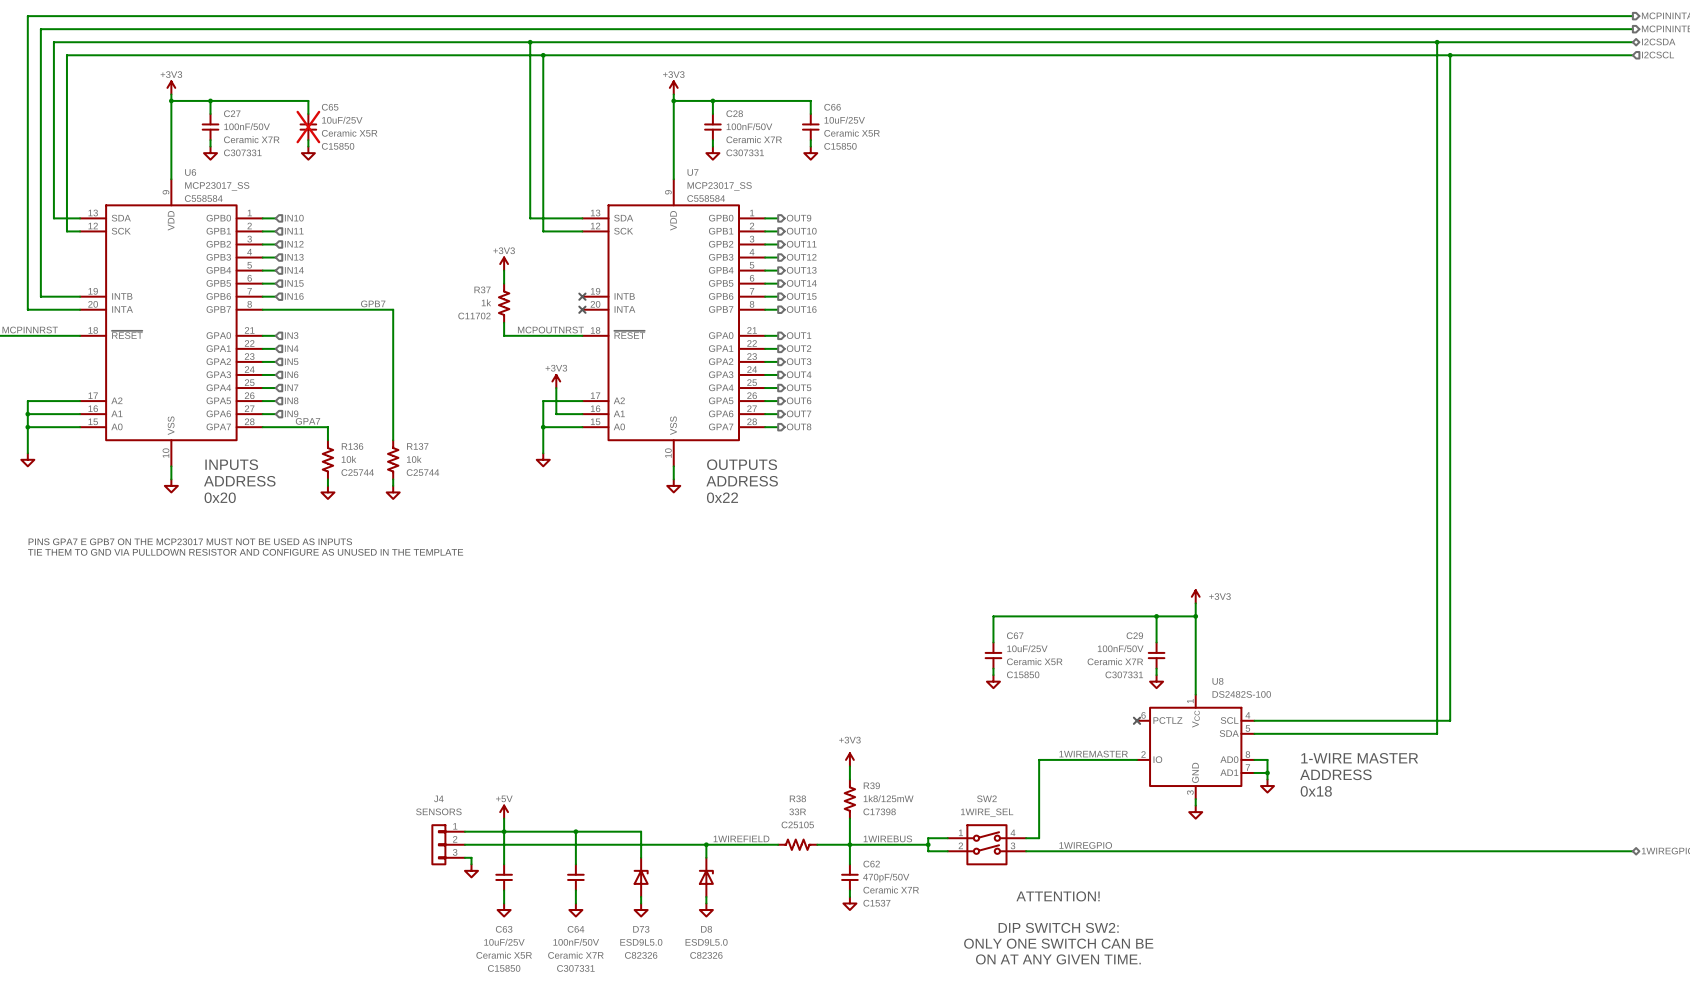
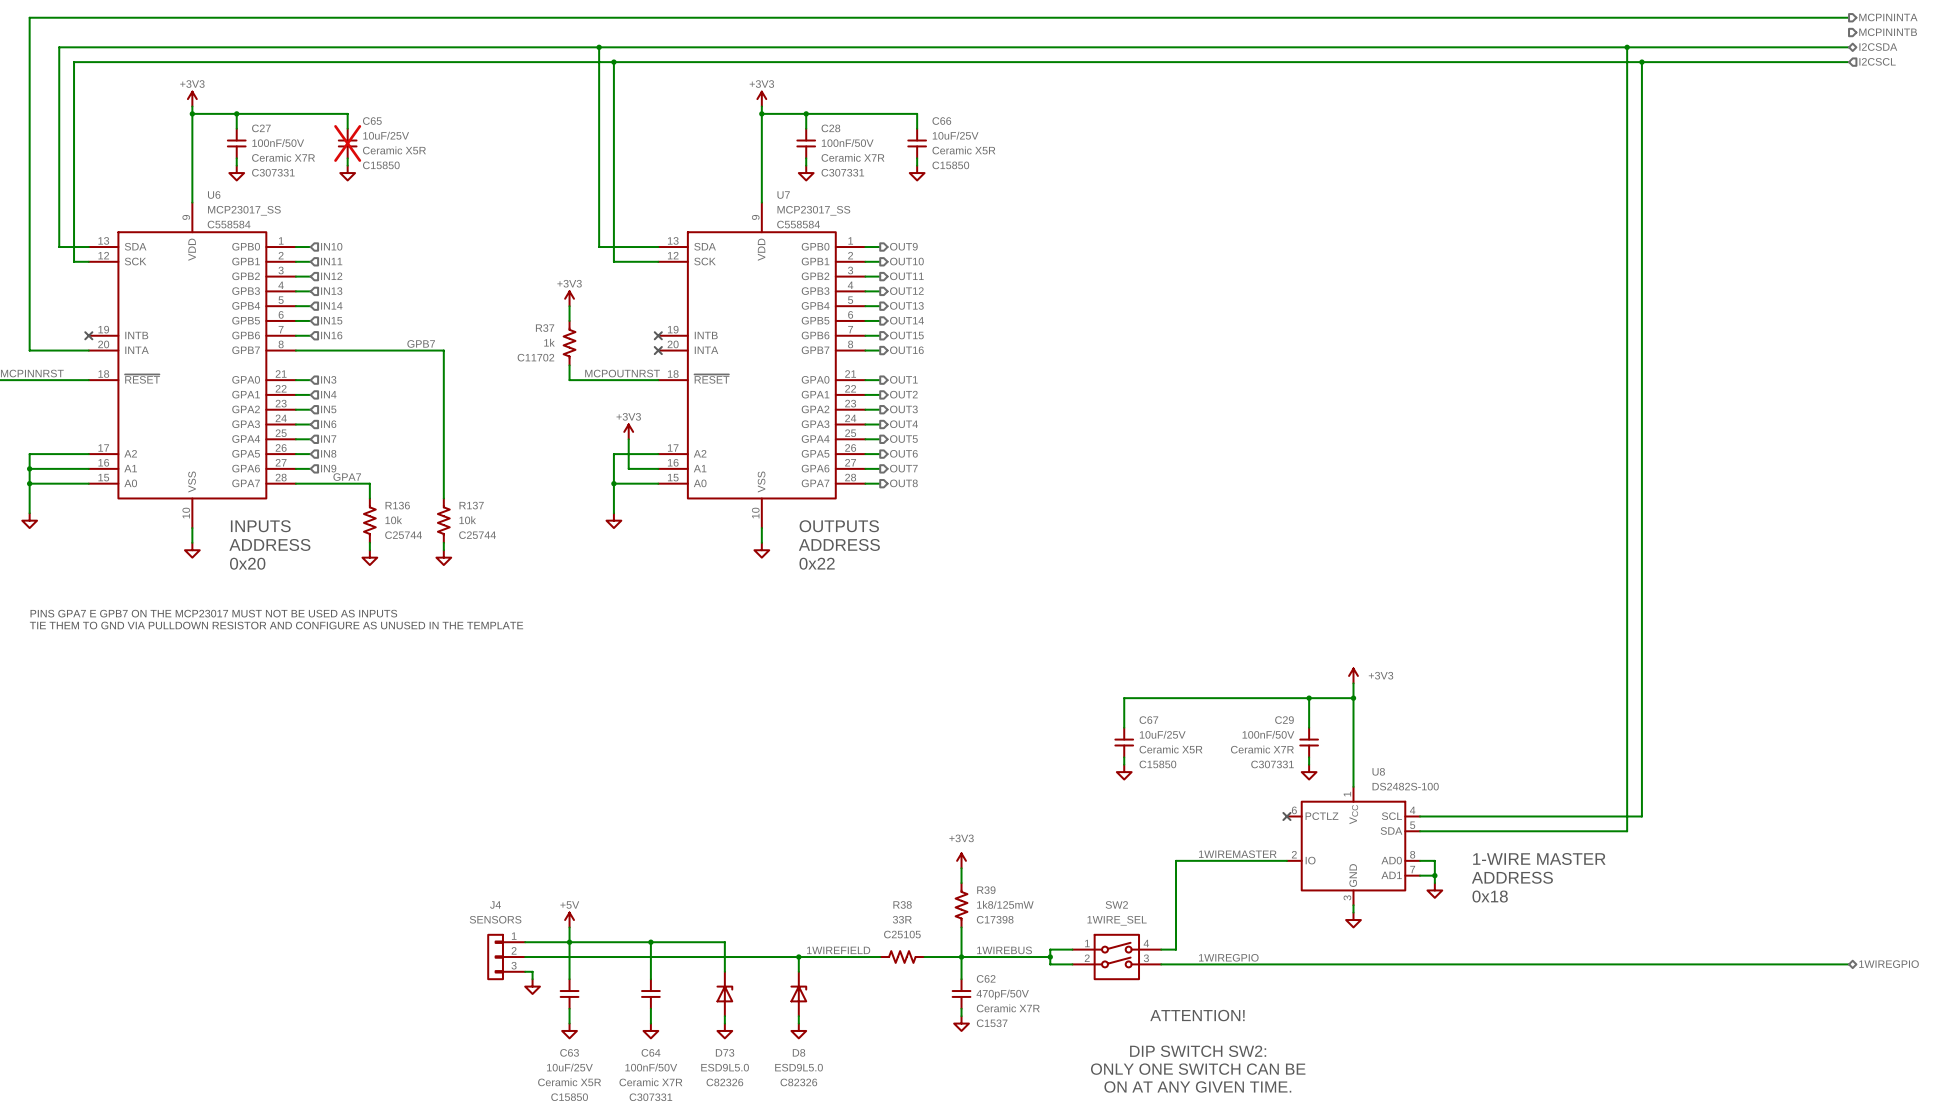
wire: (1632, 29) (40, 29) (40, 296) (80, 296) -> none
no-connect mark: none -> (88, 335)

